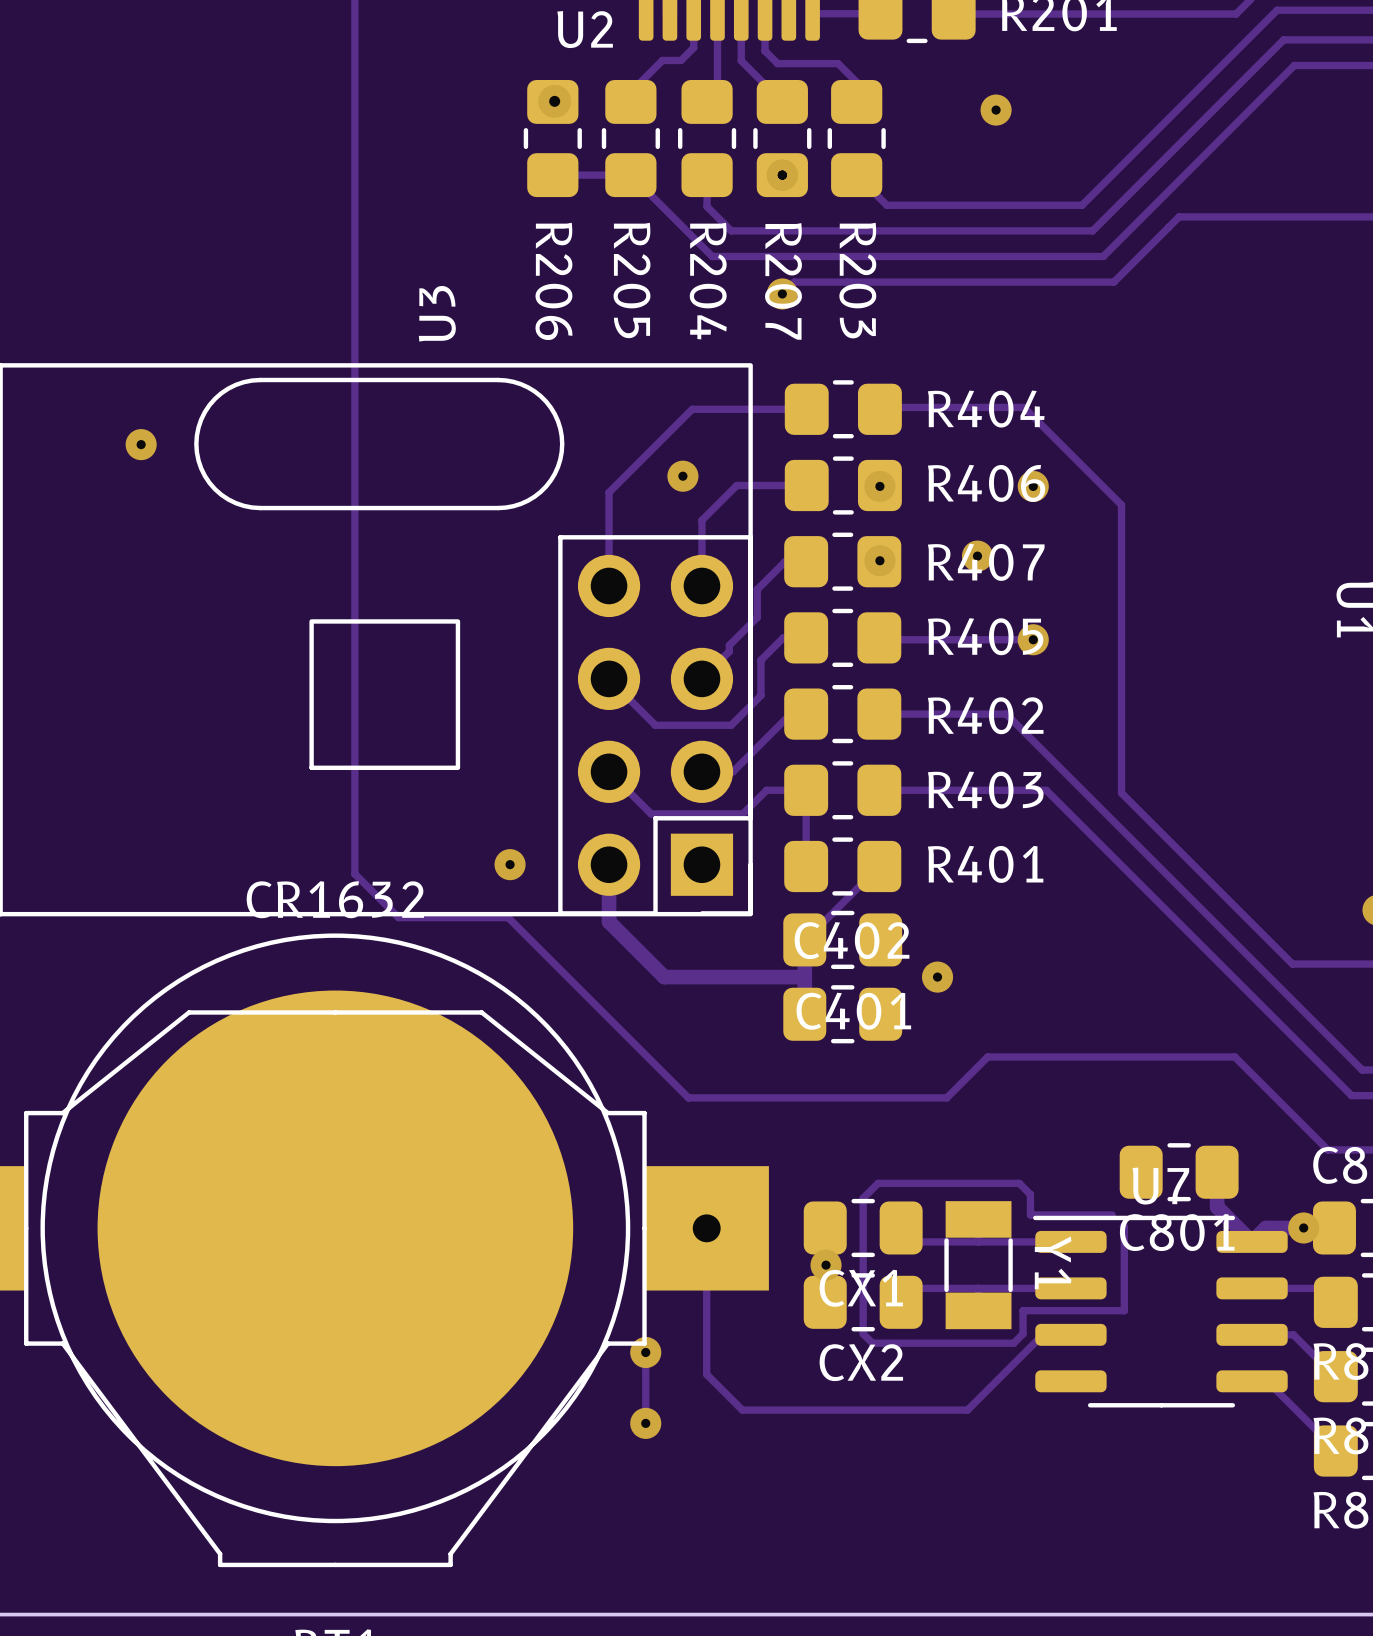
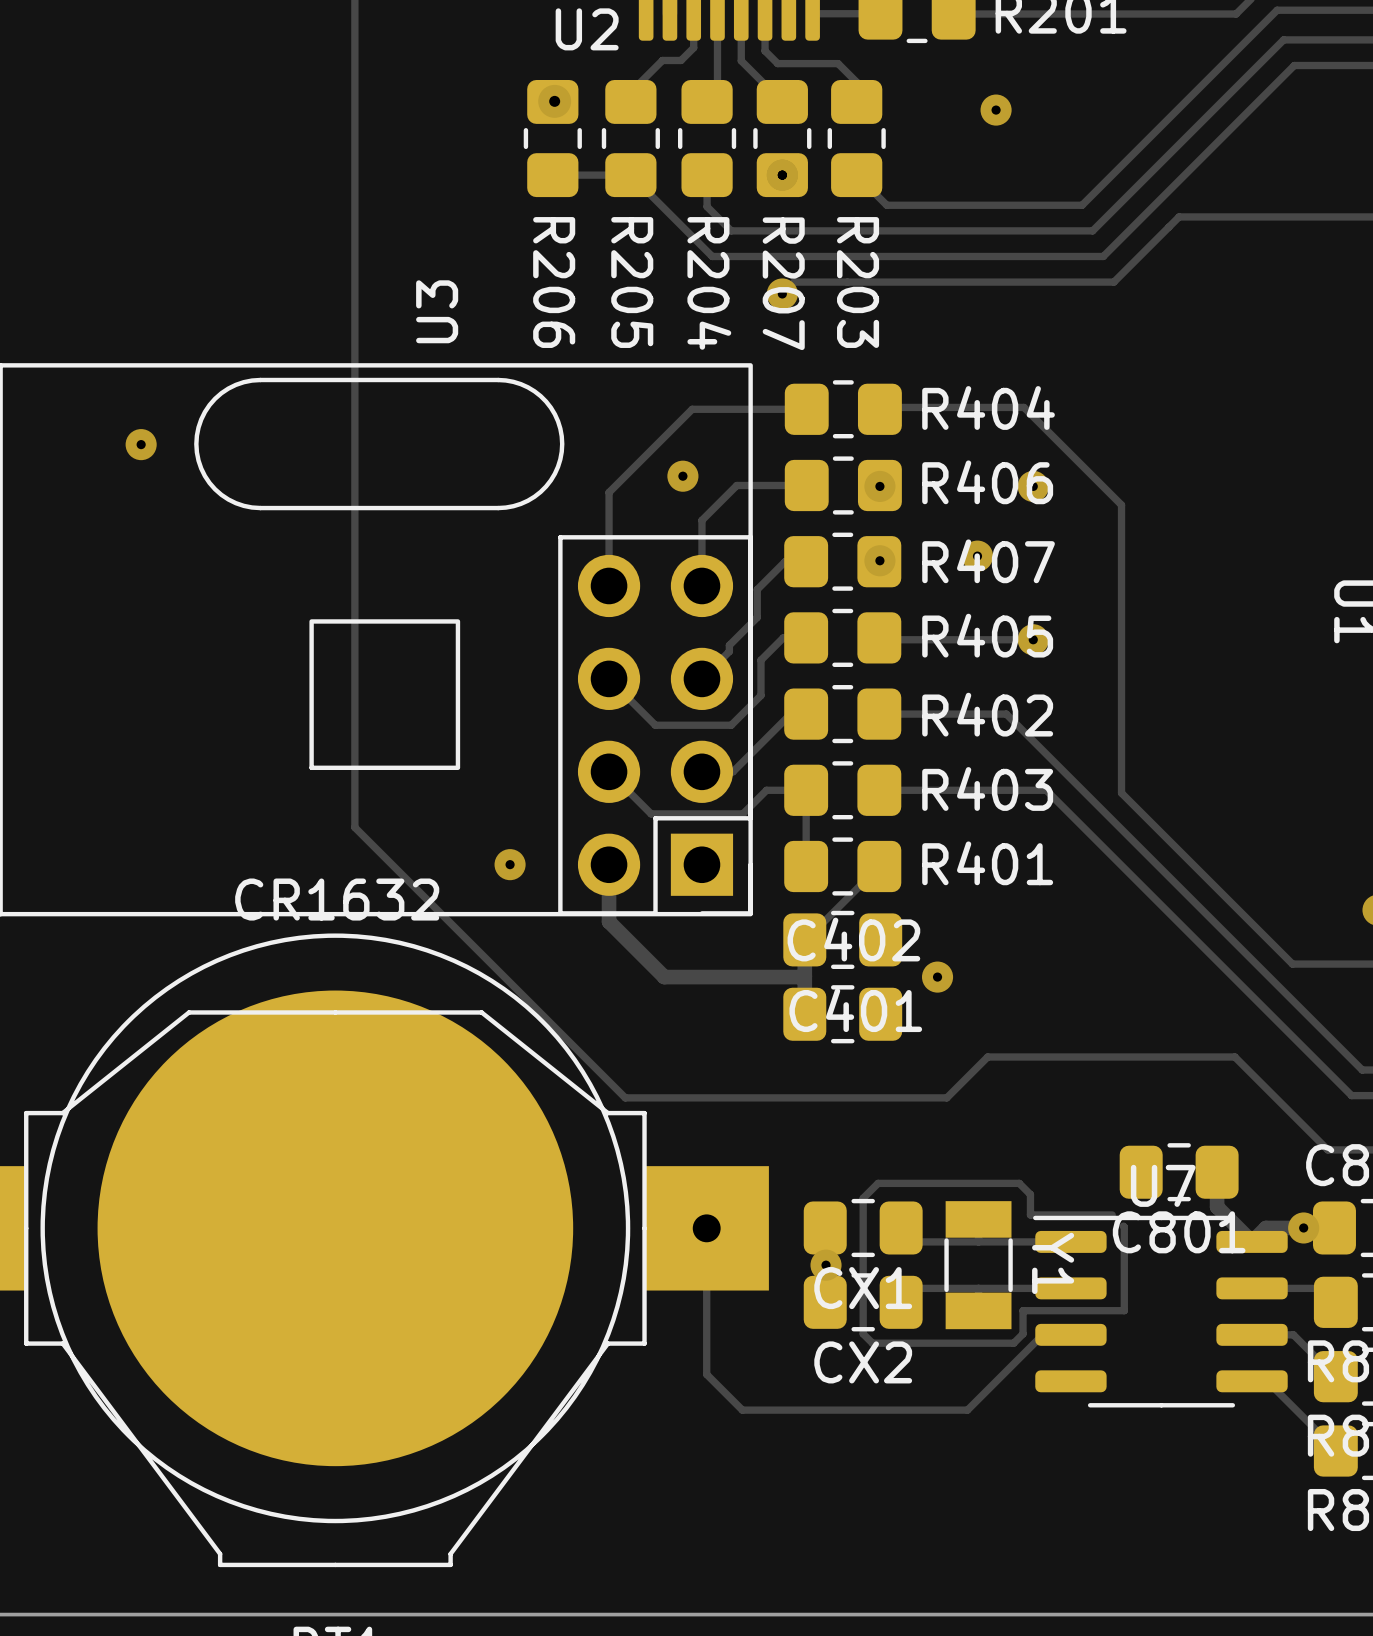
track: (354, 827) (354, 873) (398, 917) (508, 917) (688, 1097) -> (354, 827) (625, 1097) (688, 1097)
track: (645, 1352) (645, 1423) -> none
via: (645, 1352) -> none
via: (645, 1423) -> none

